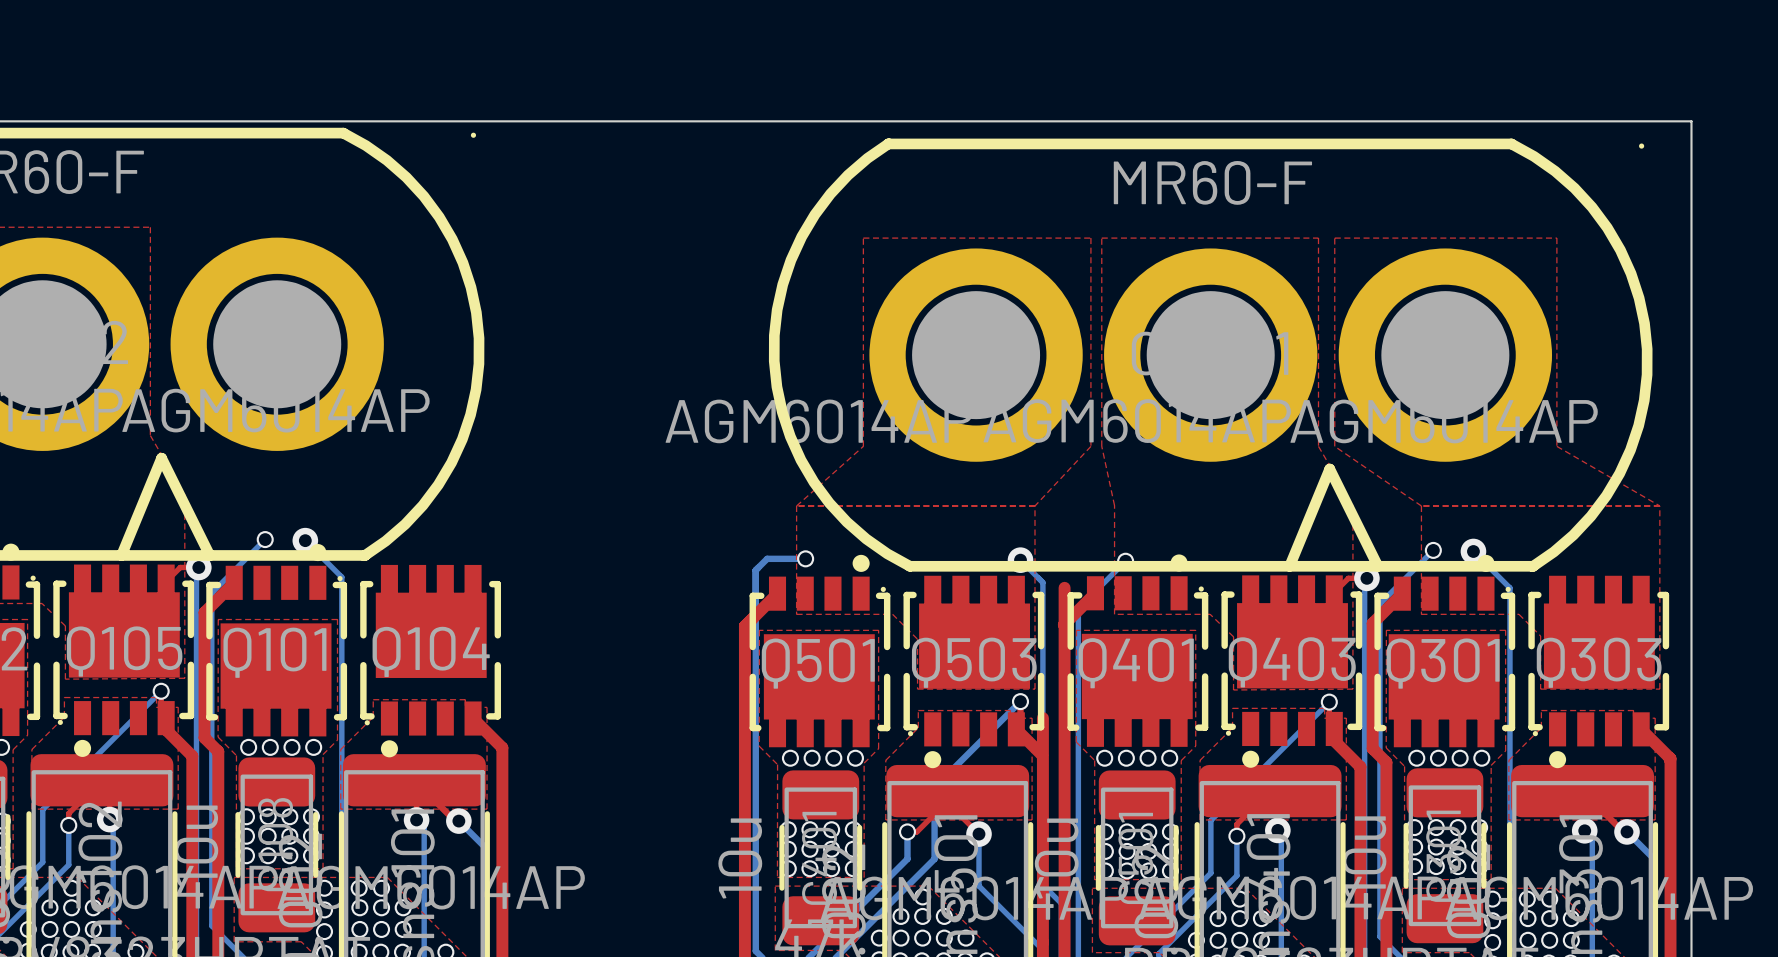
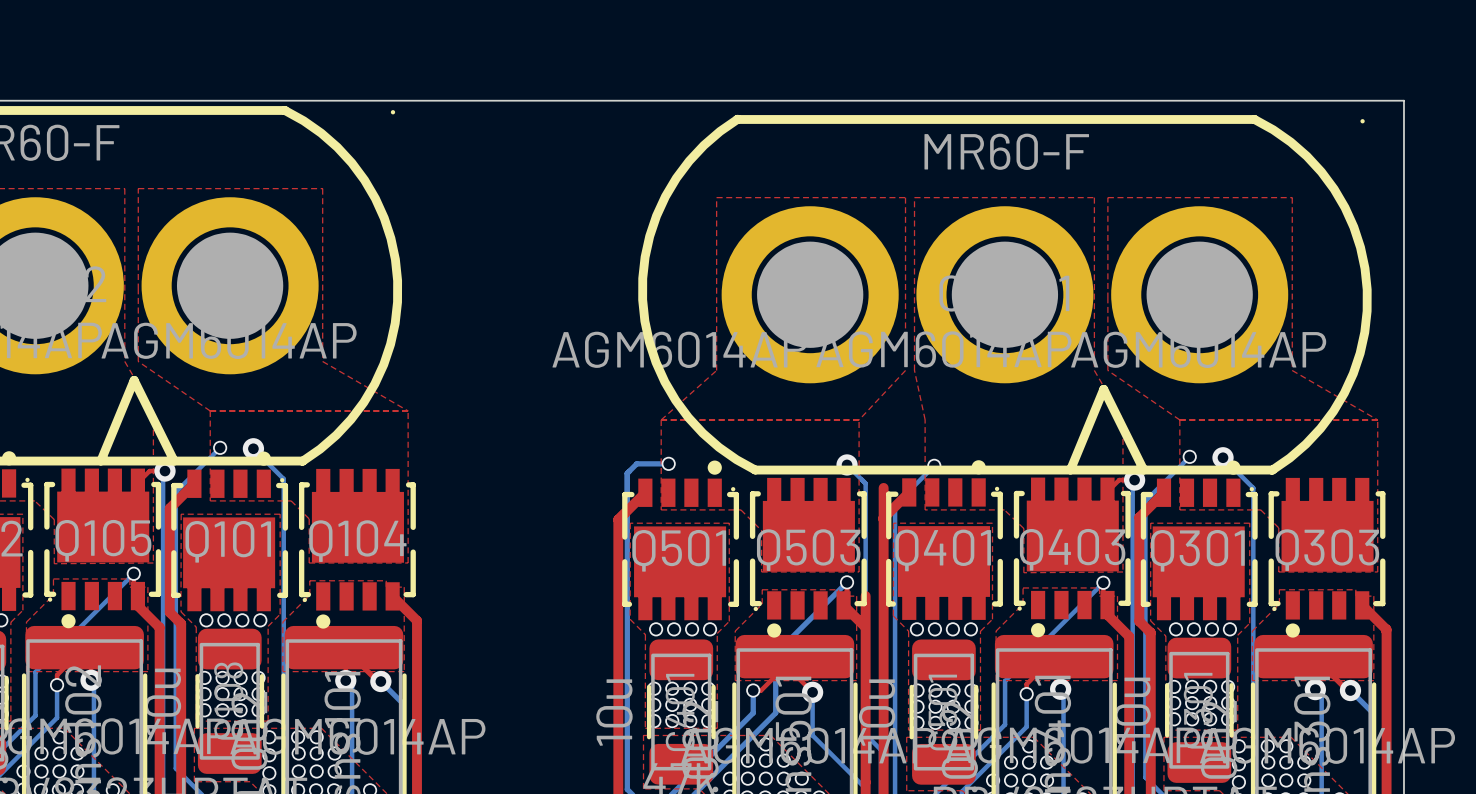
top zone outline: none -> (210, 410) (138, 361) (138, 188) (322, 188) (322, 361) (408, 410)
top zone outline: none -> (210, 410) (408, 410)
top zone outline: none -> (210, 410) (210, 500) (291, 500) (309, 518) (309, 562) (408, 562) (408, 410)

